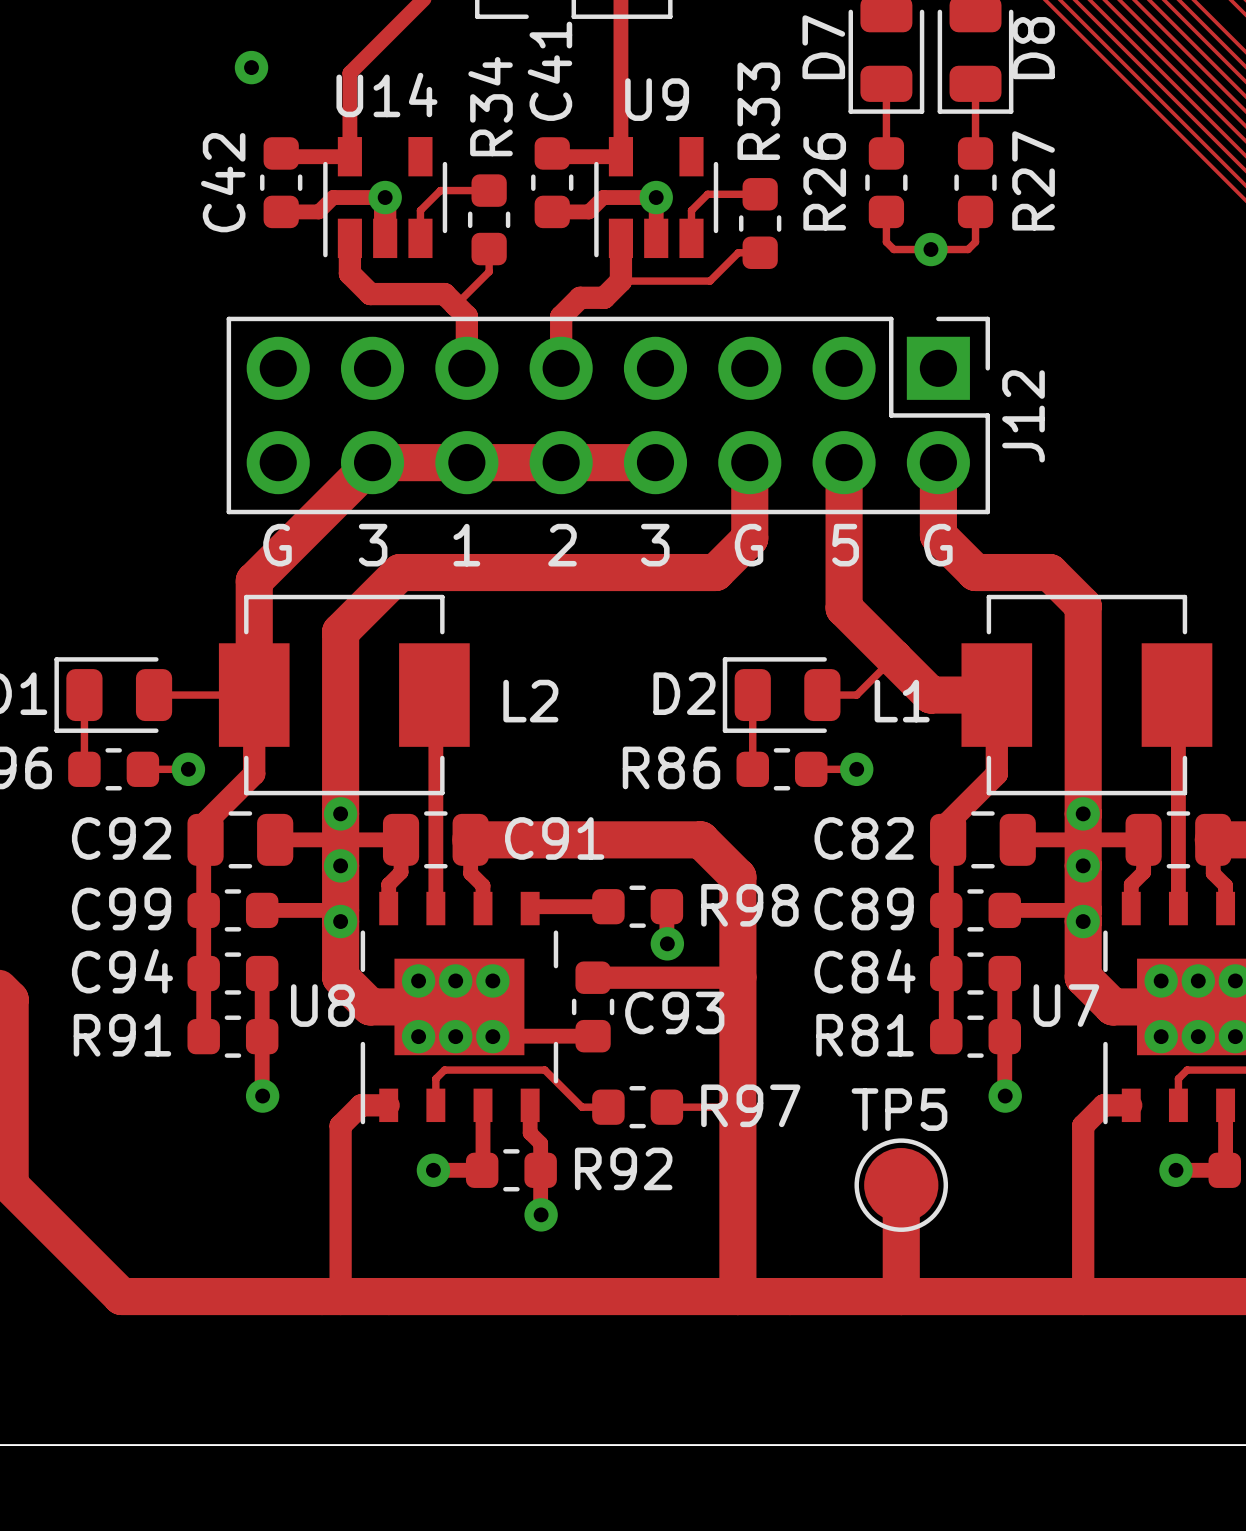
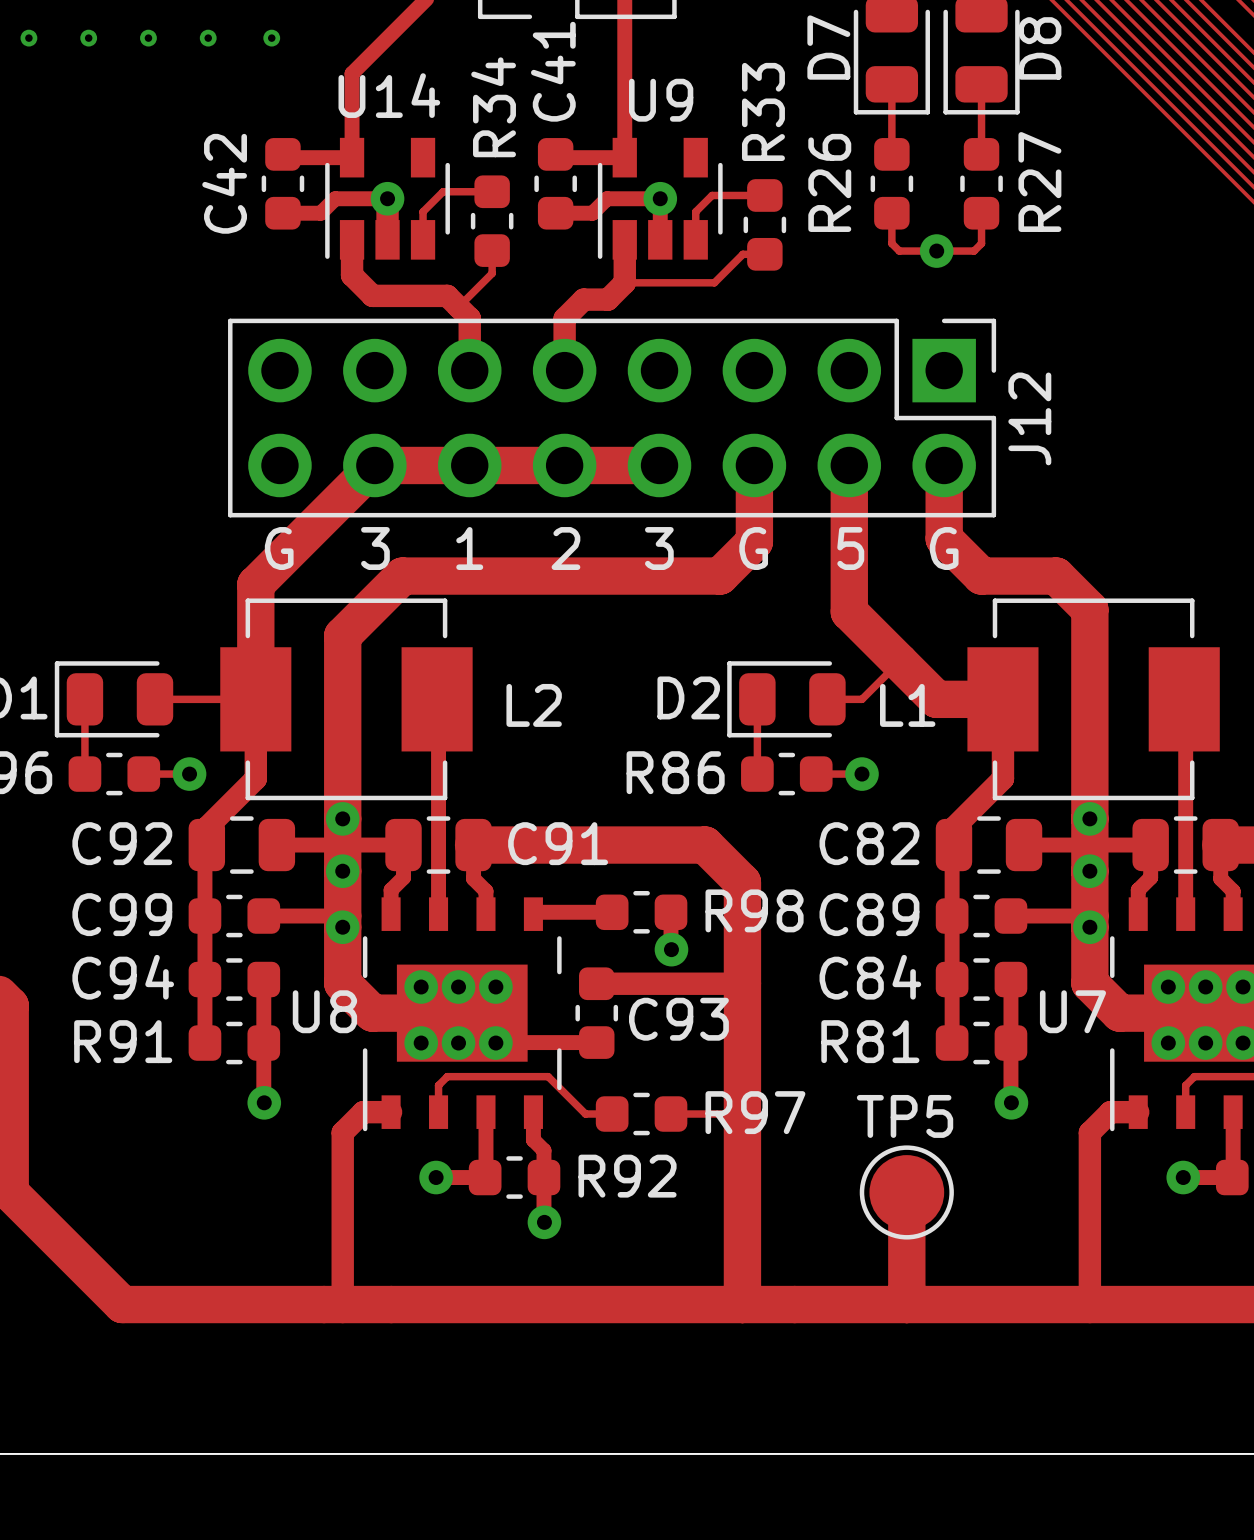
via: none -> (28, 38)
via: none -> (88, 38)
via: none -> (148, 38)
via: none -> (208, 38)
via: none -> (271, 38)
via: (251, 67) -> none

